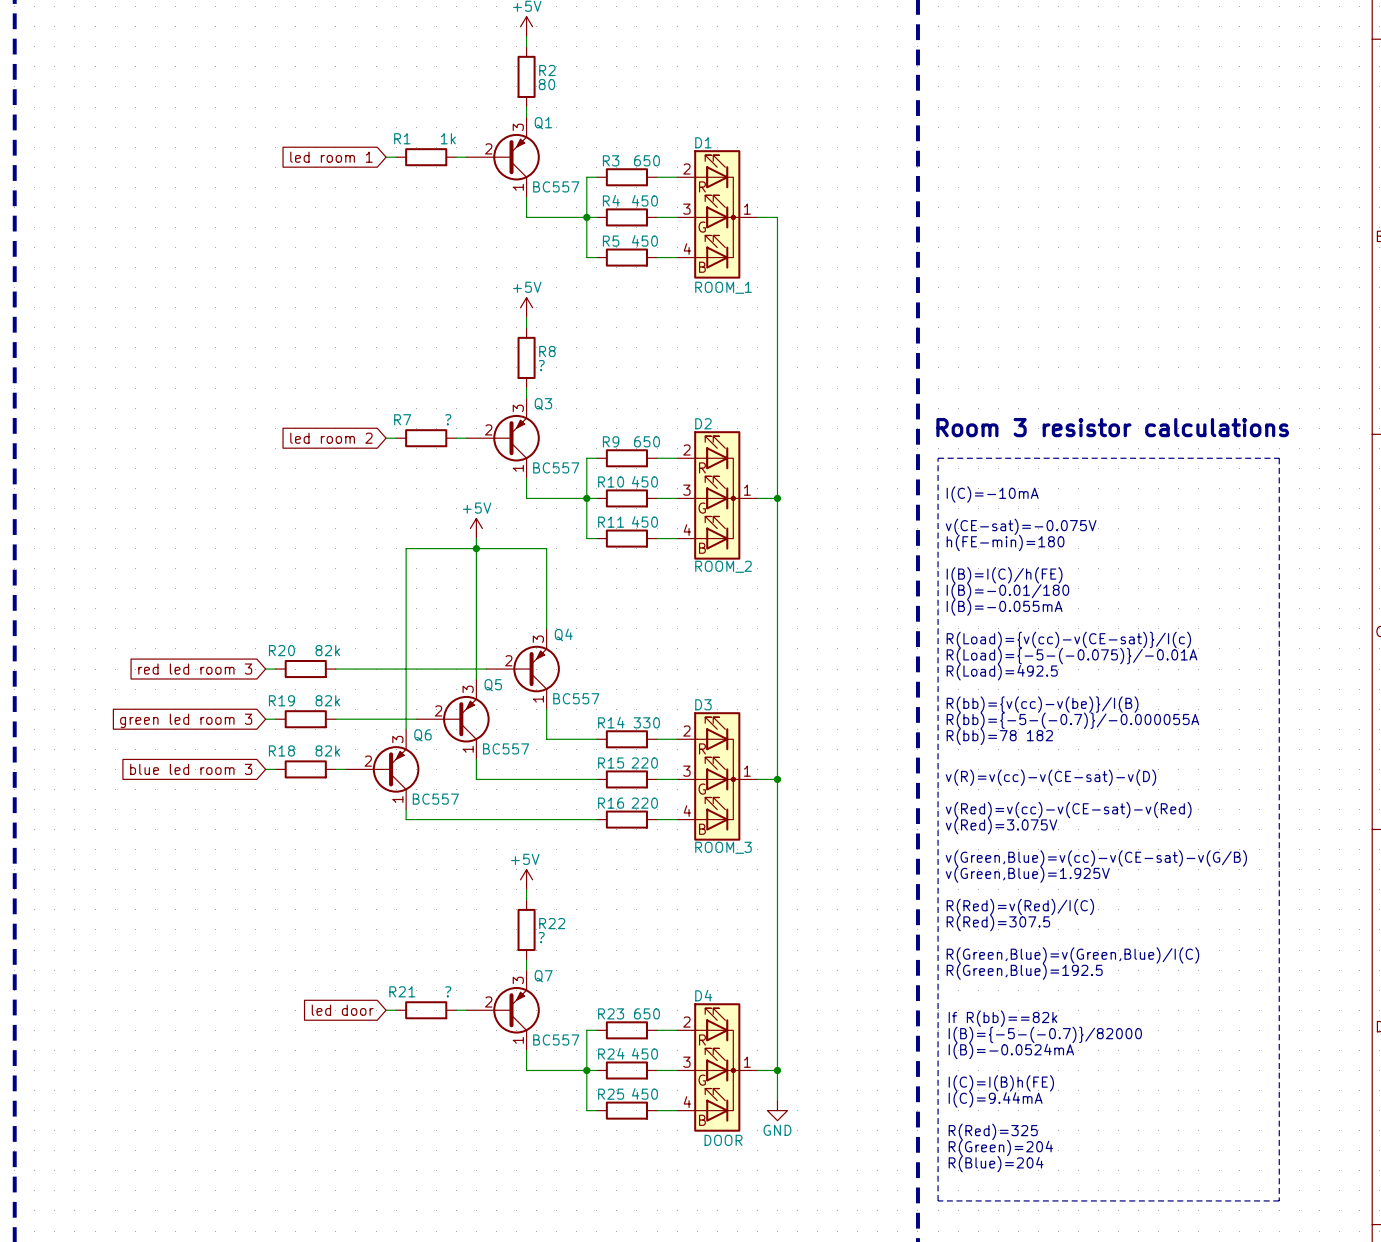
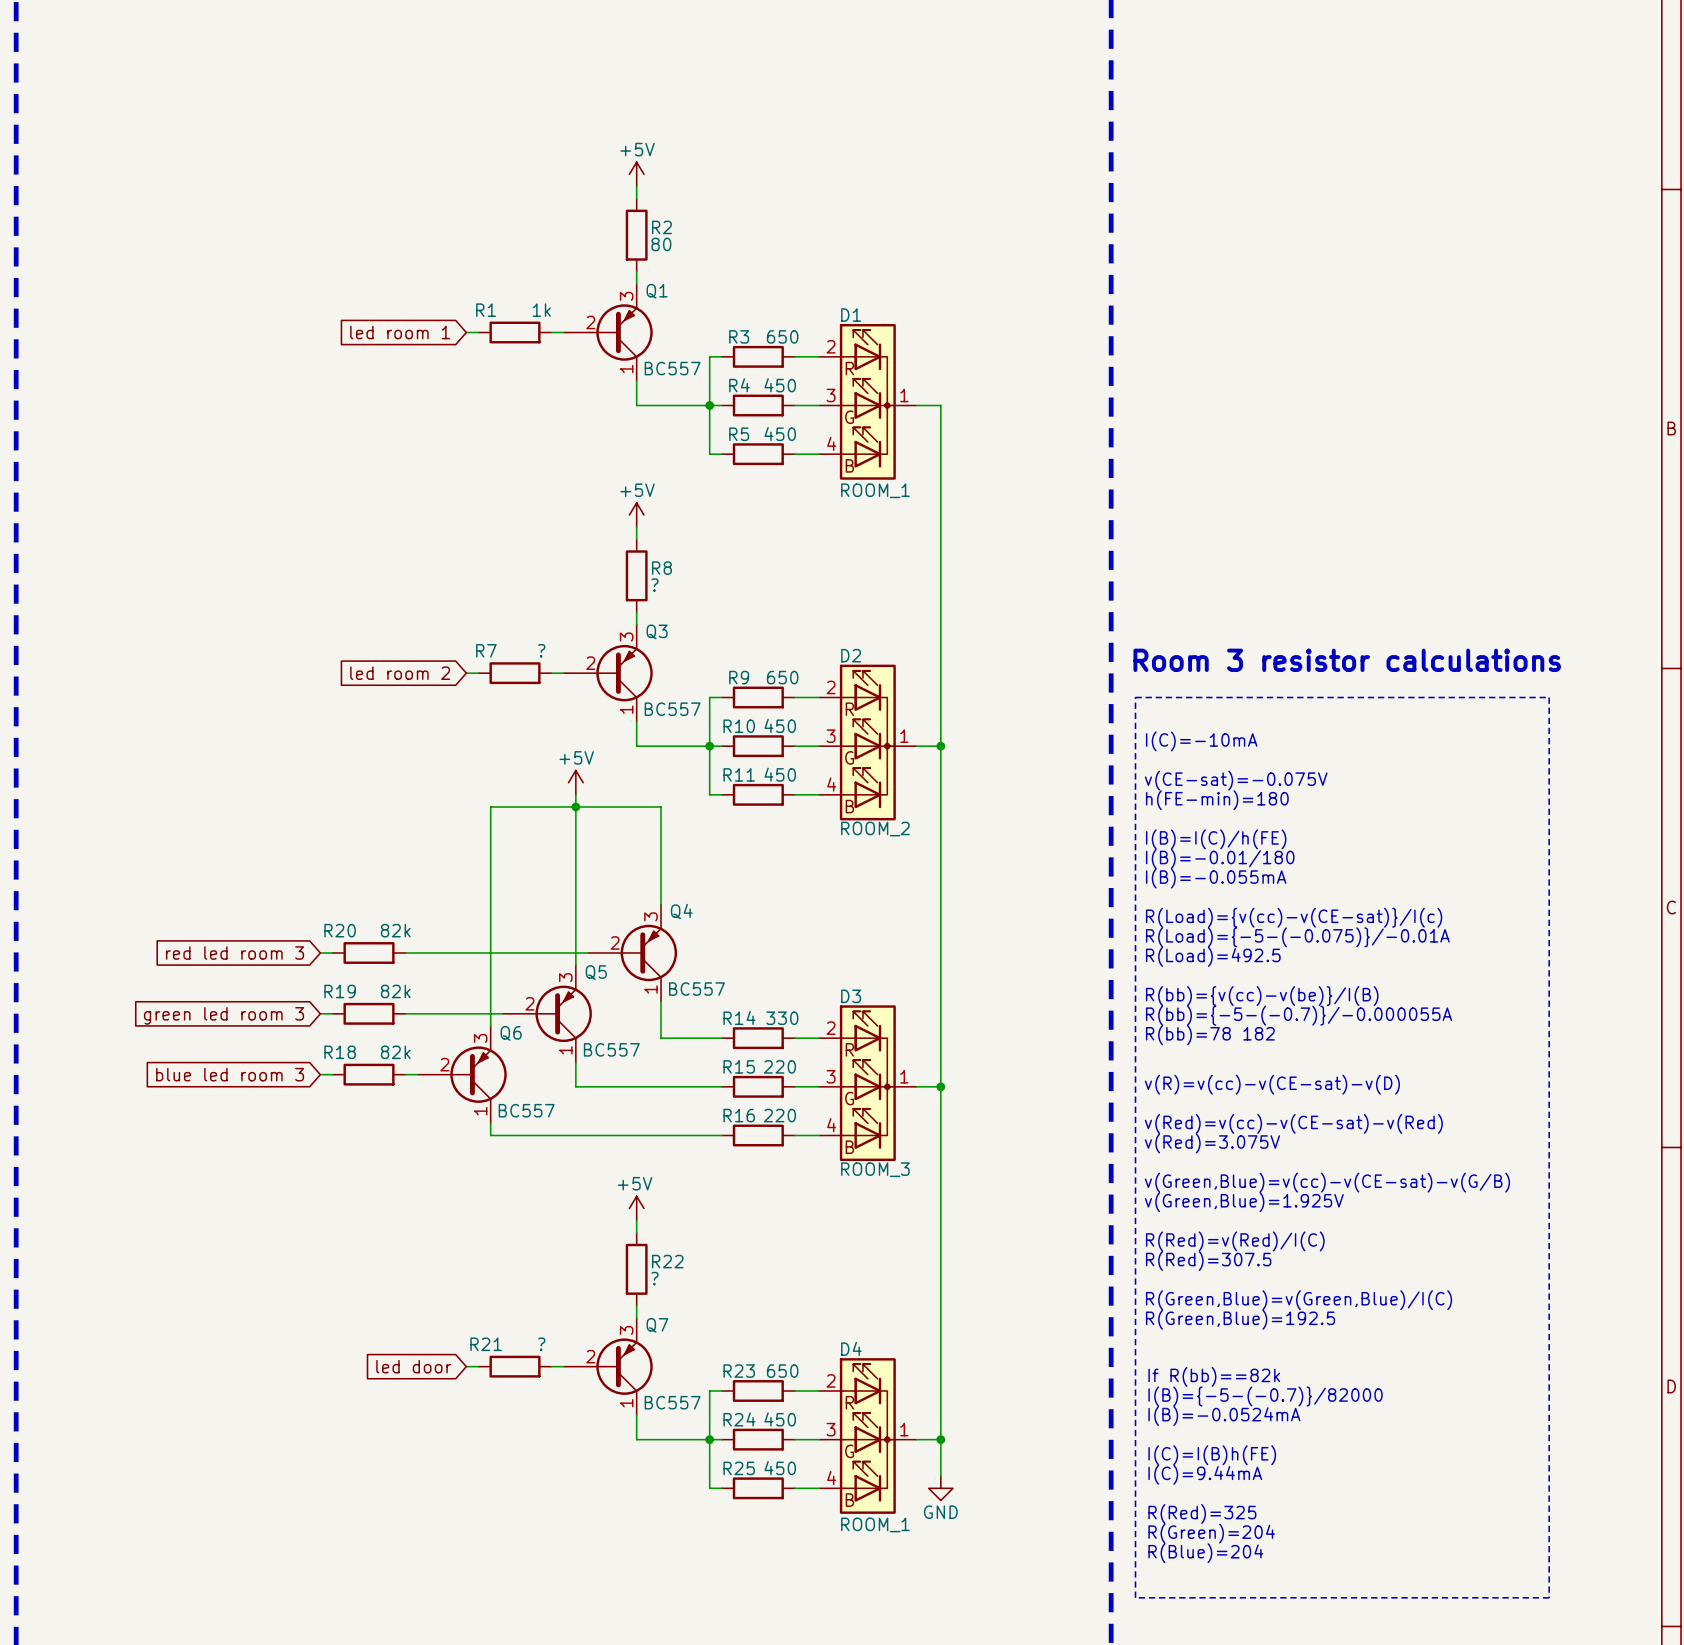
D4 value: DOOR (723, 1140) -> ROOM_1 (875, 1524)

